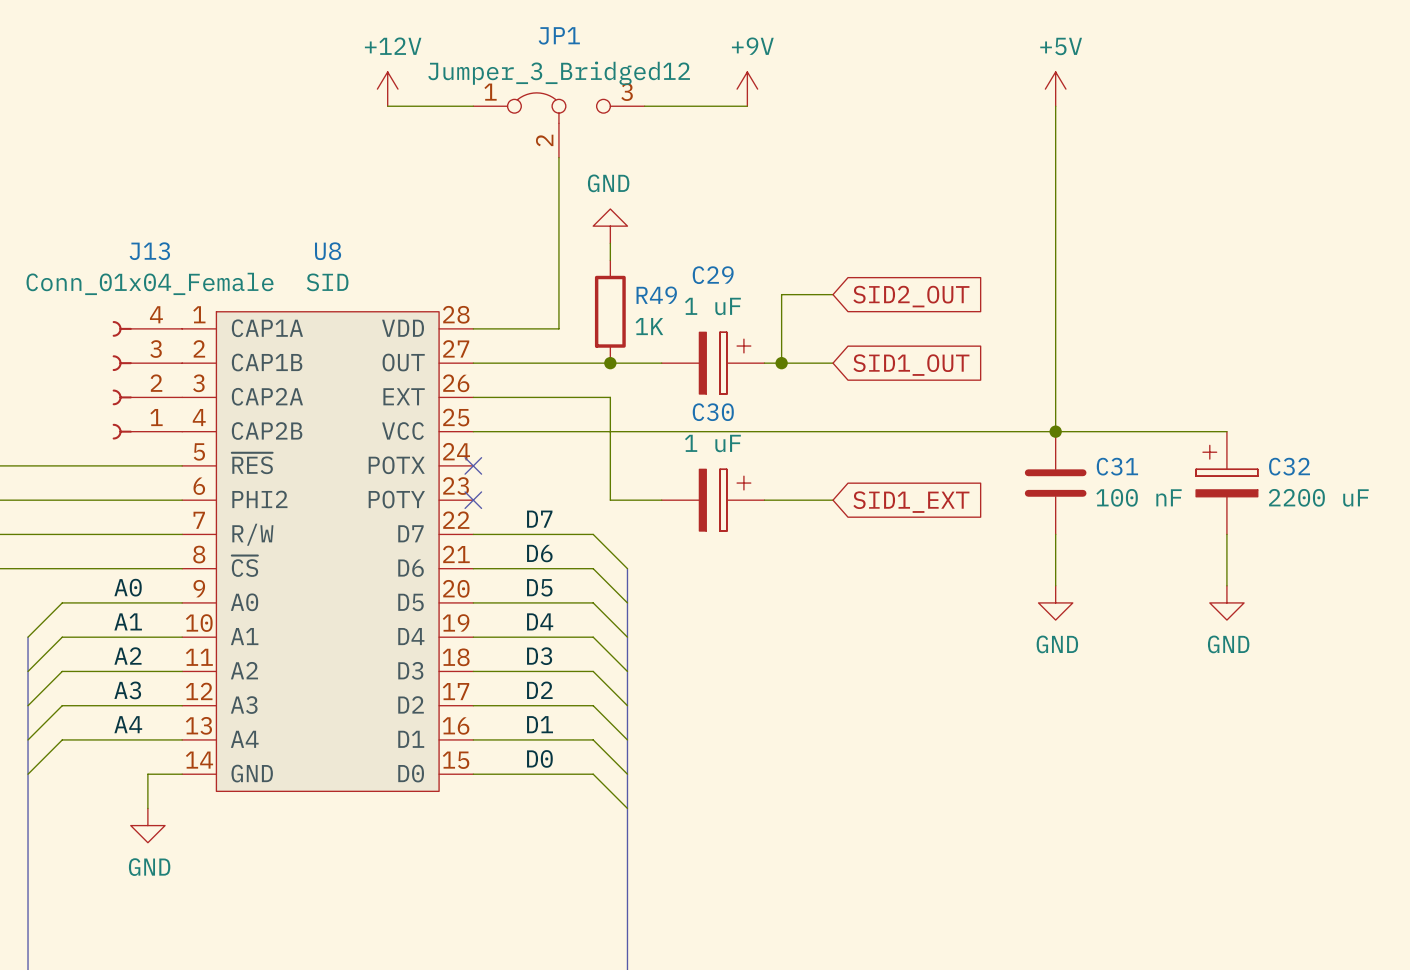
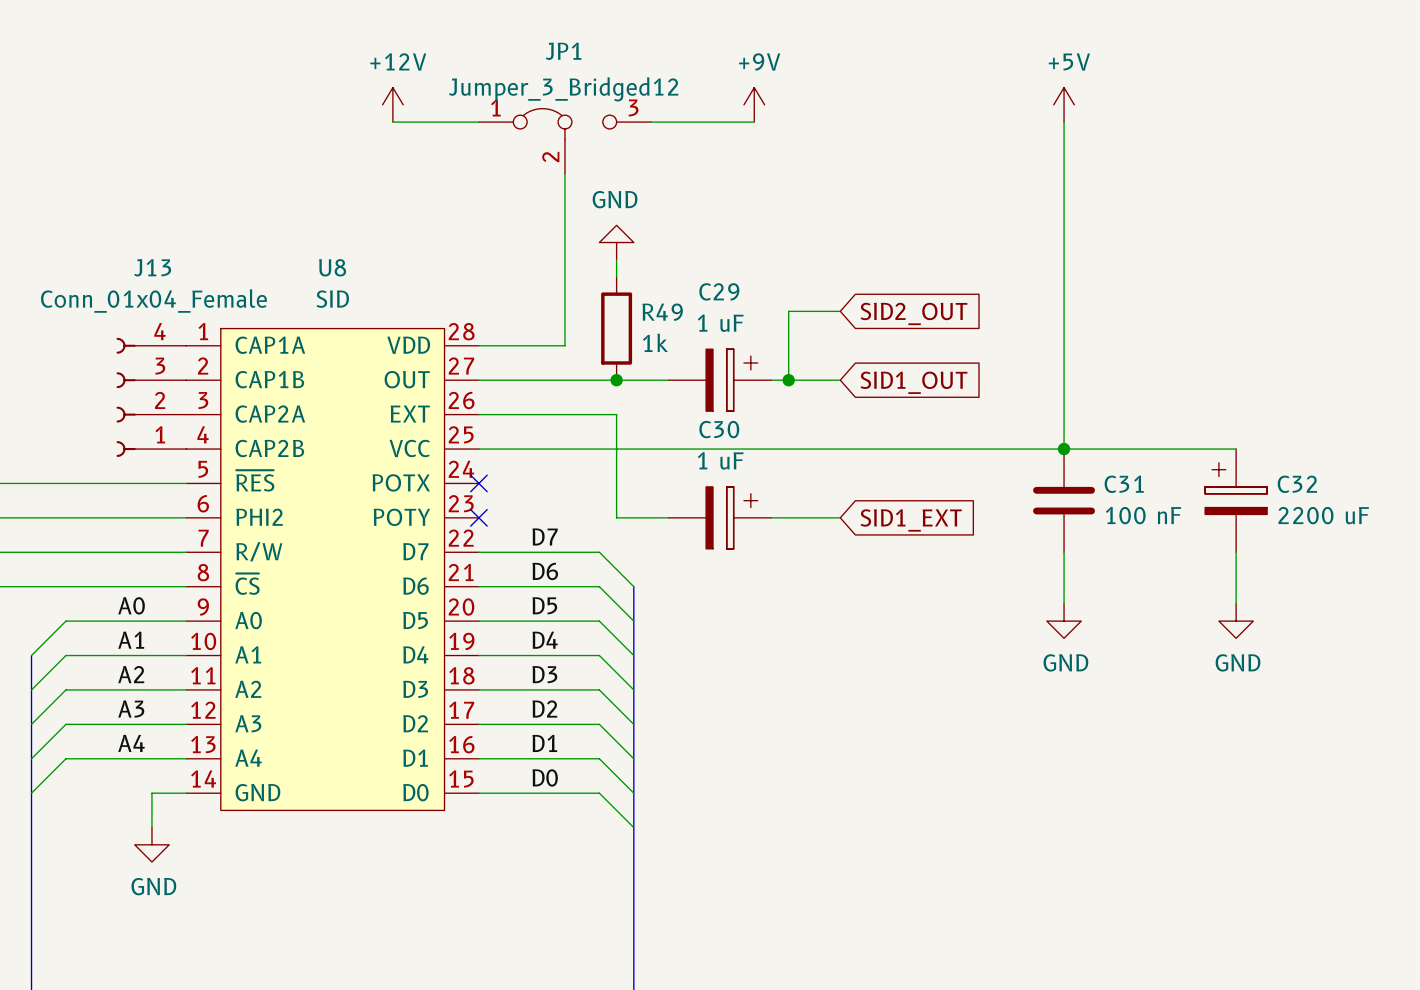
R49 value: 1K (649, 326) -> 1k (655, 342)

